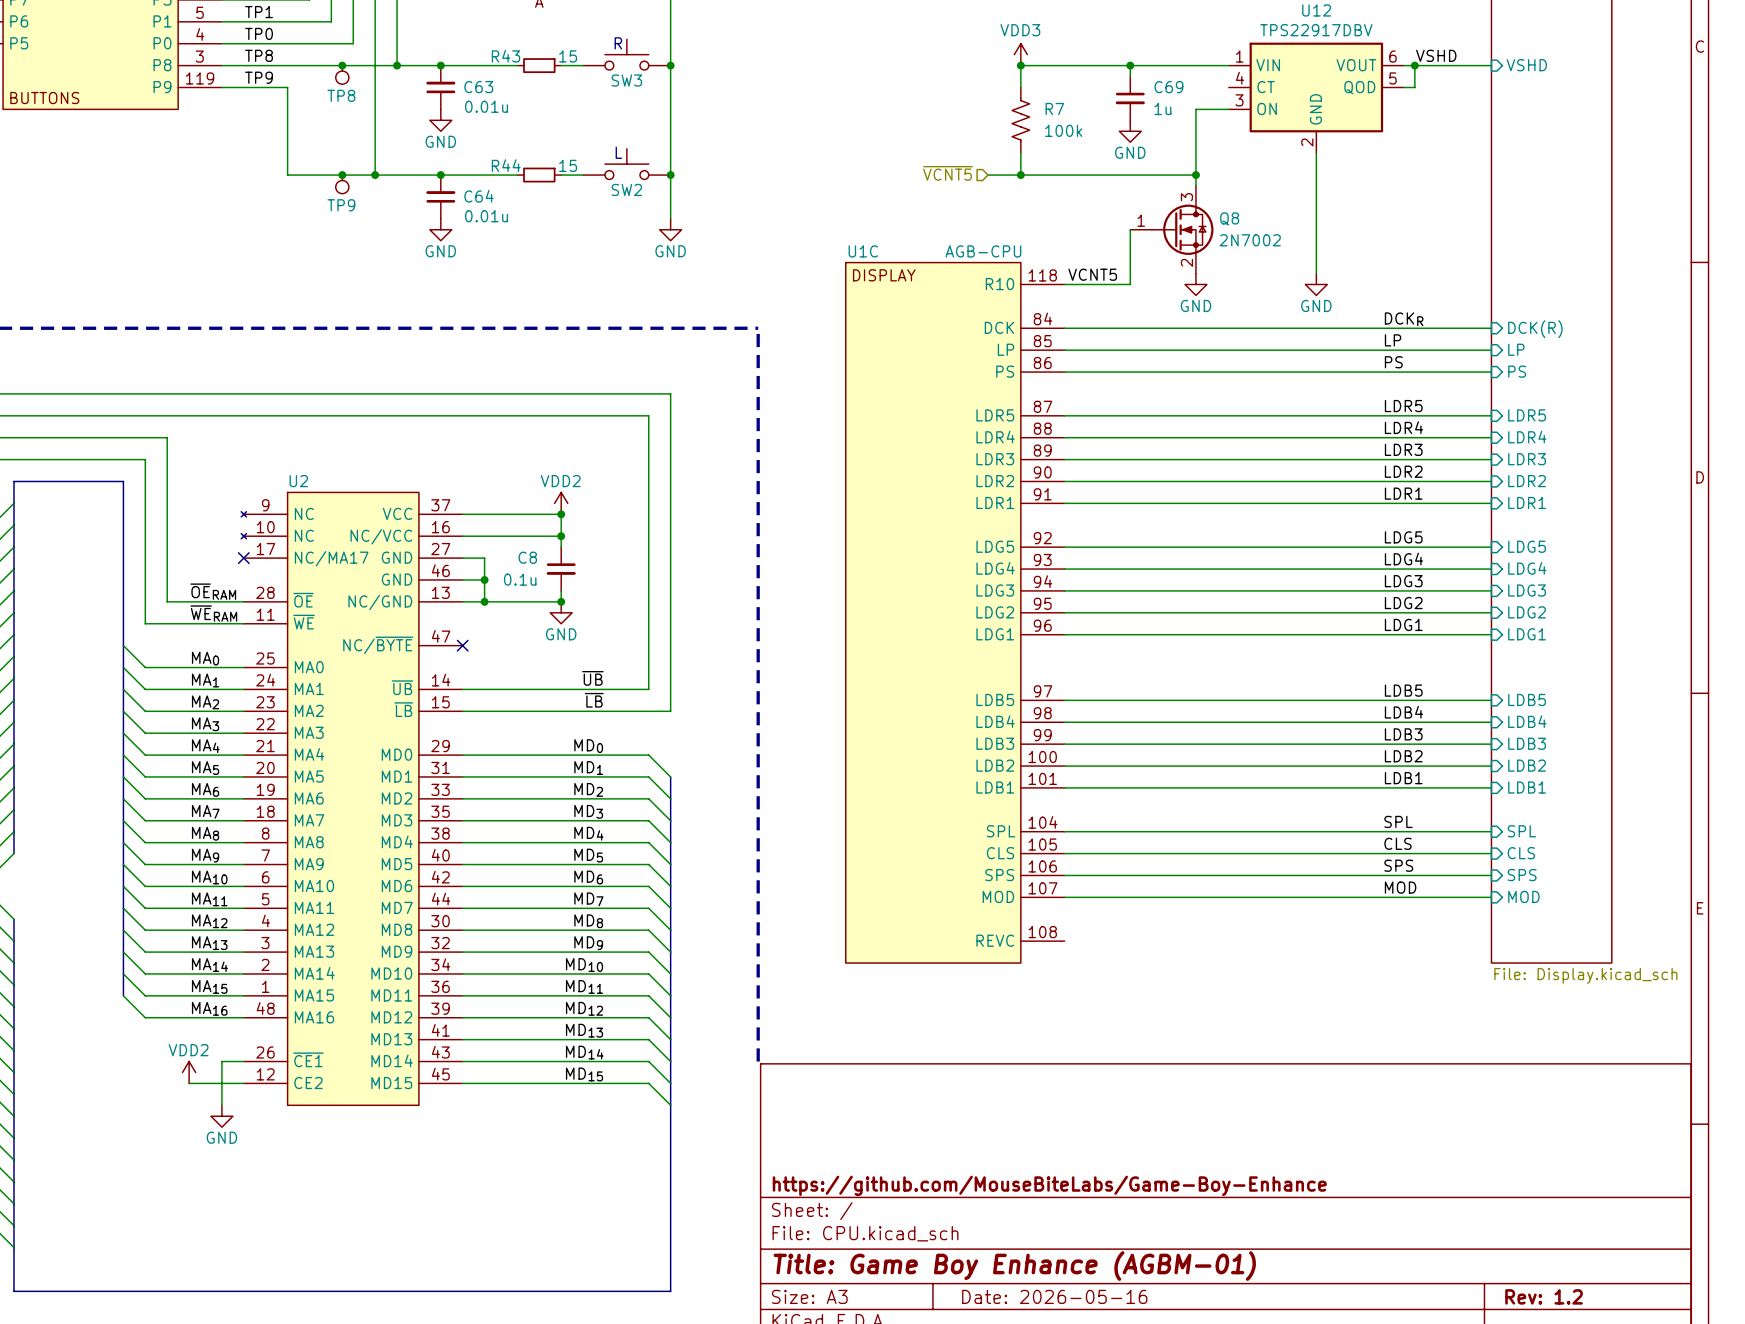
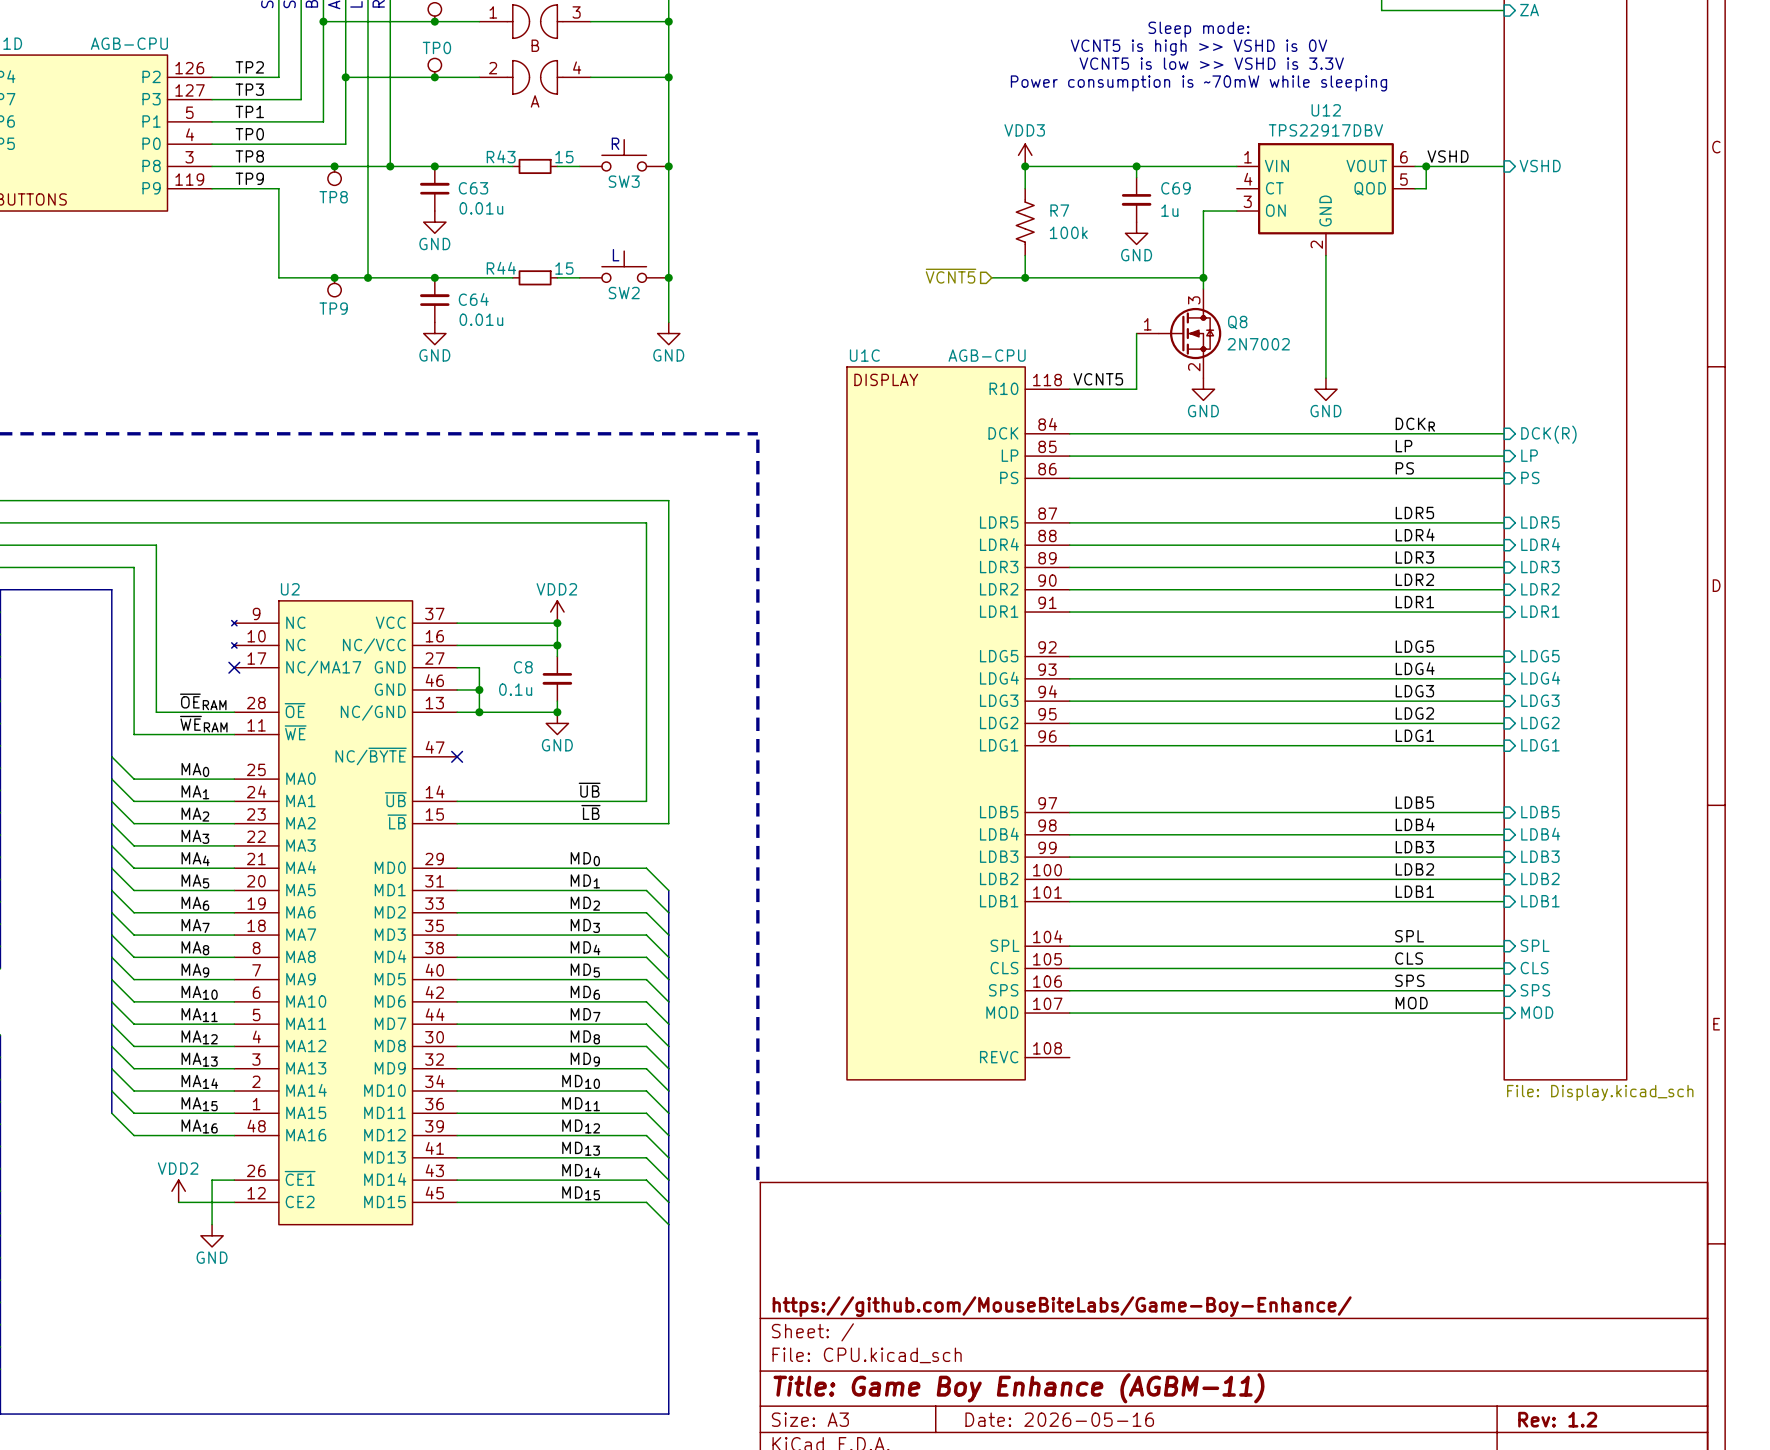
title block: https://github.com/MouseBiteLabs/Game-Boy-Enhance (1049, 1185) -> https://github.com/MouseBiteLabs/Game-Boy-Enhance/ (1062, 1306)
title block: Title: Game Boy Enhance (AGBM-01) (1014, 1266) -> Title: Game Boy Enhance (AGBM-11) (1019, 1388)

